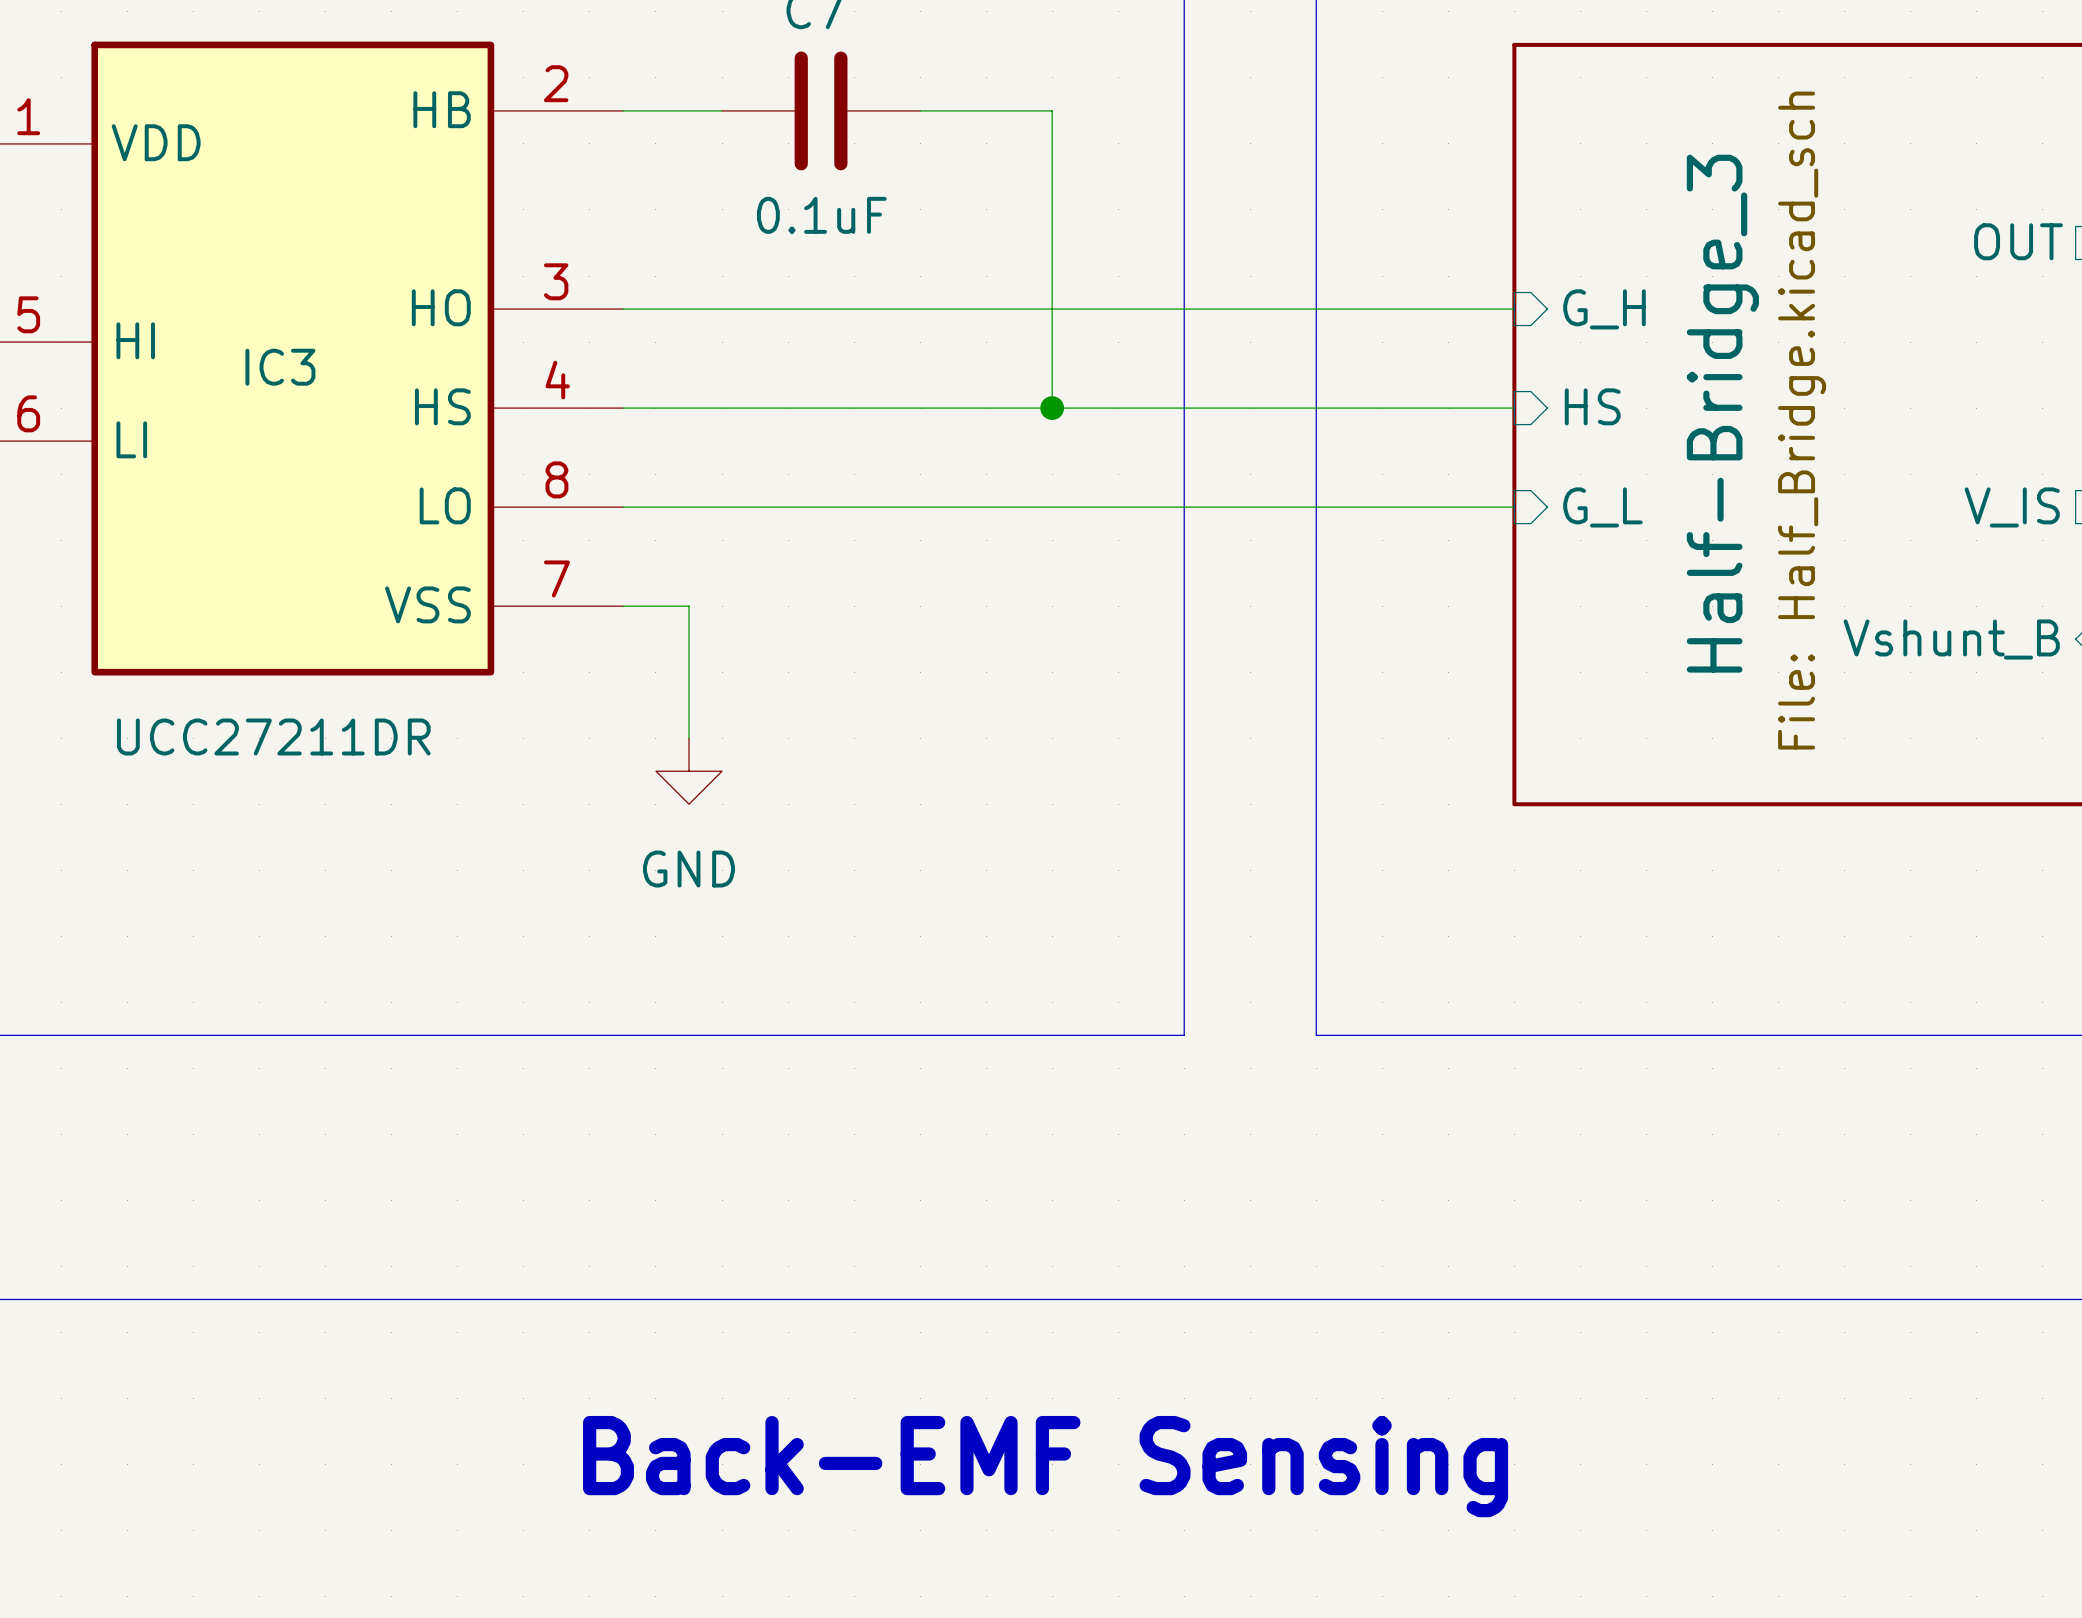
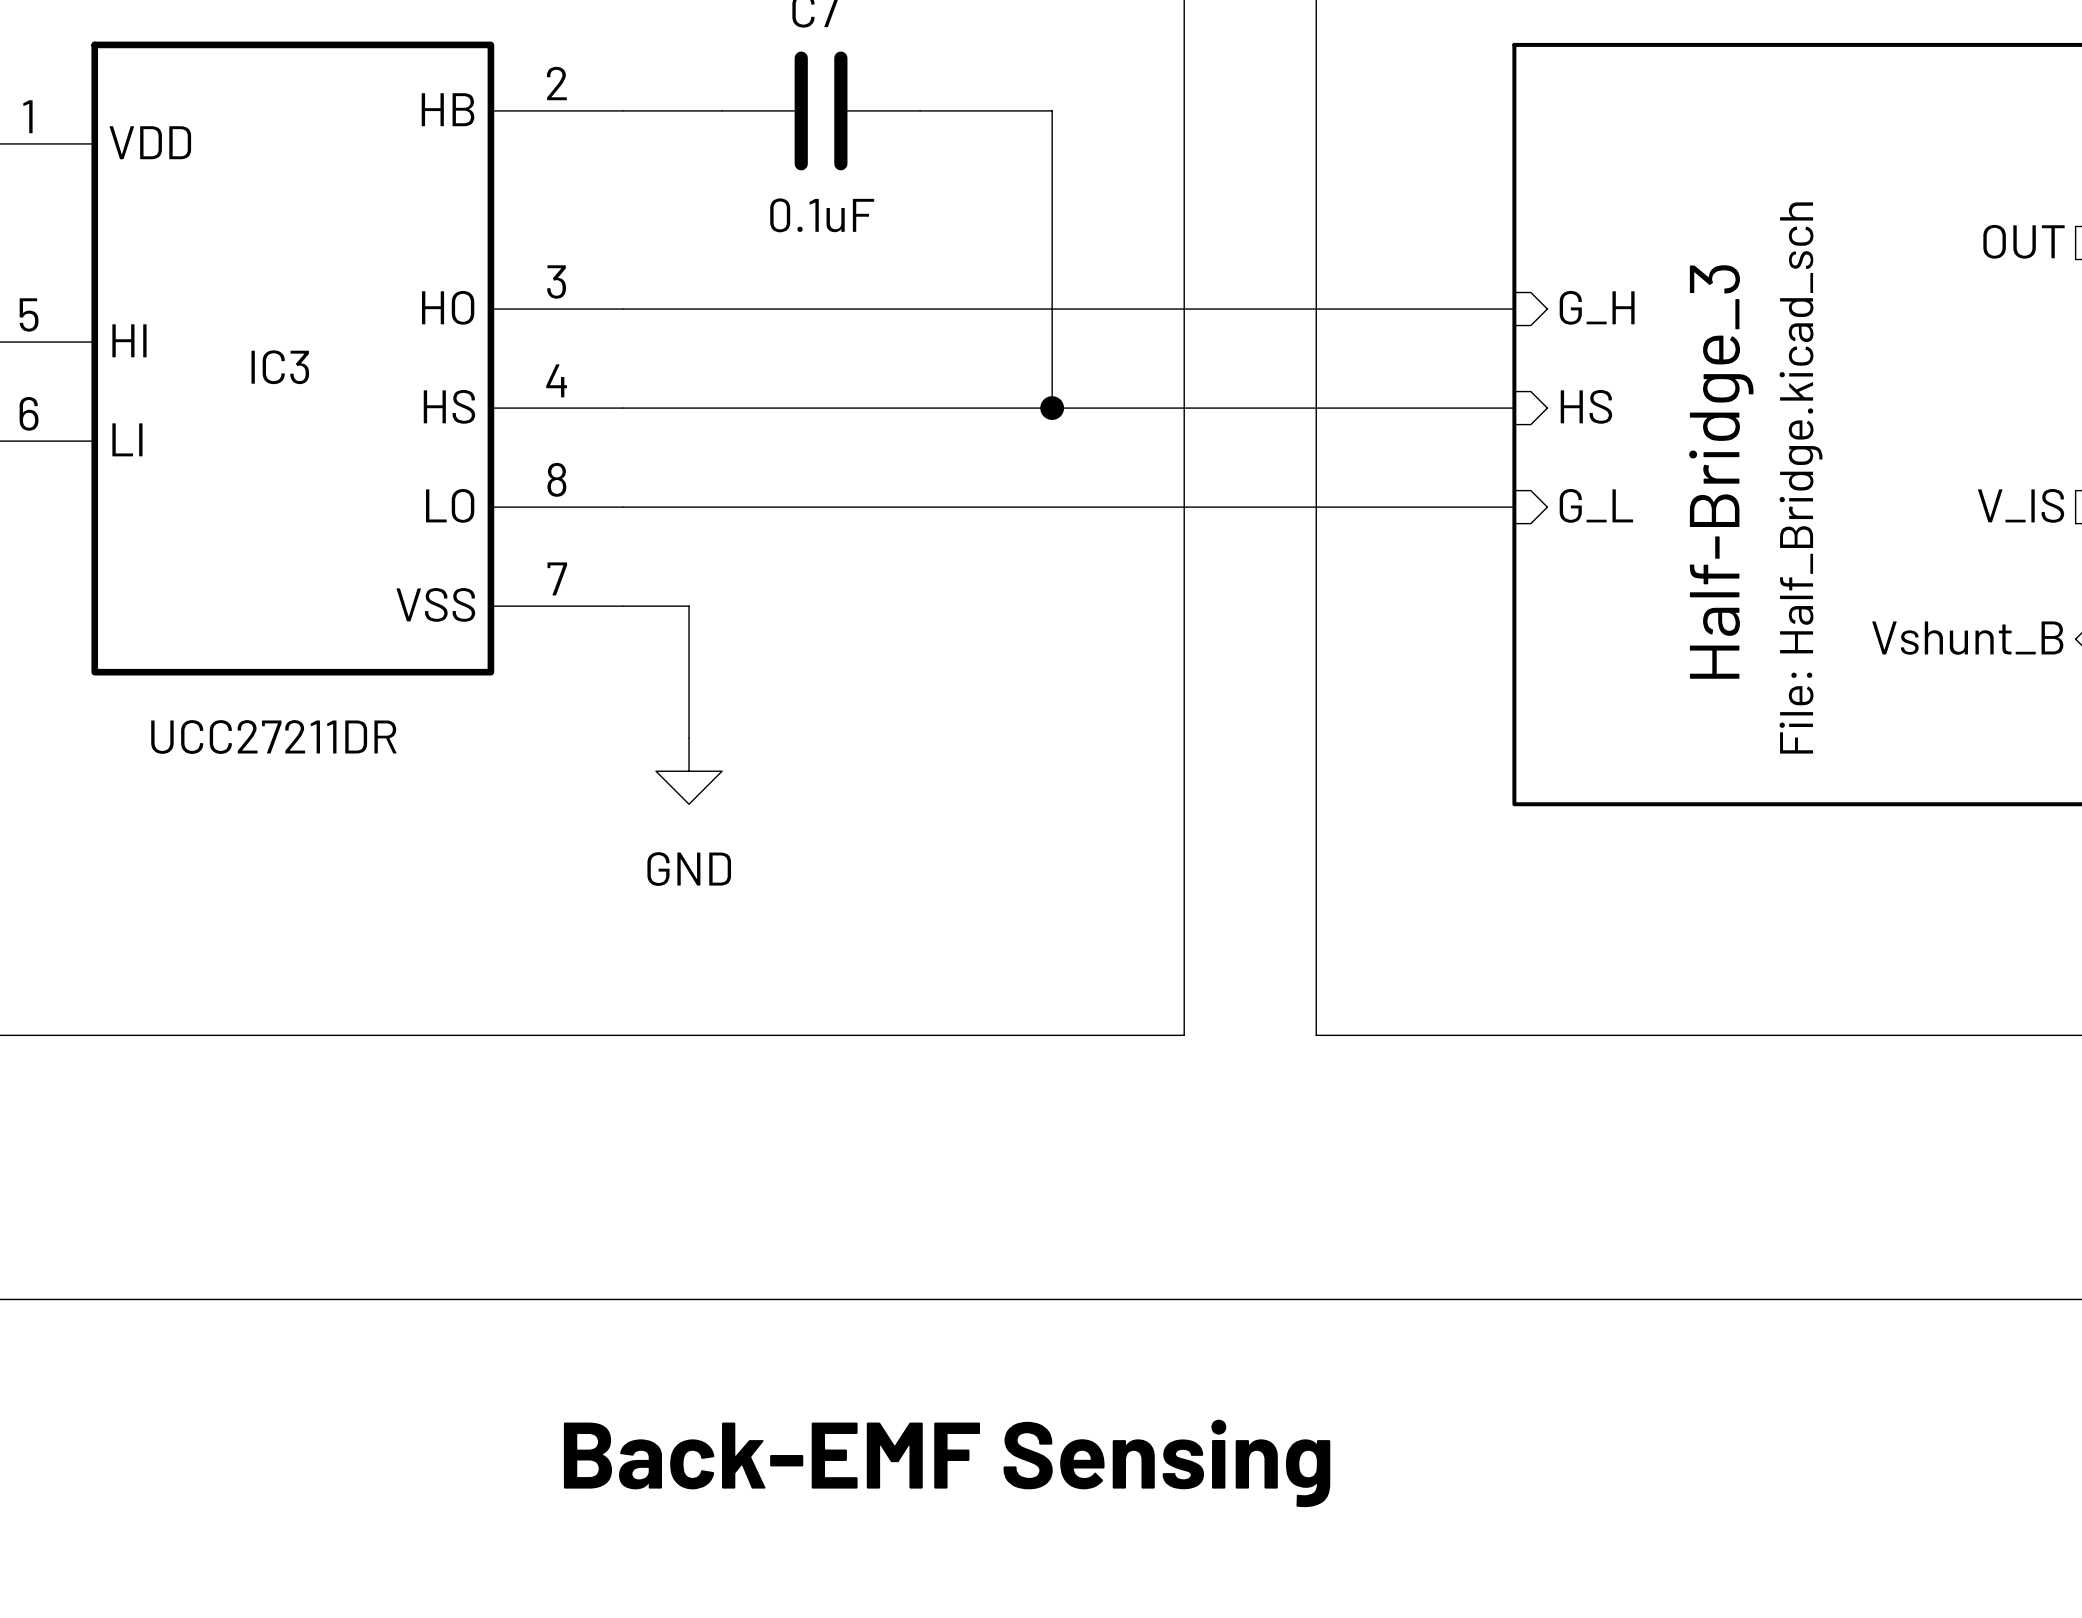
text position: Back-EMF Sensing (1045, 1466) -> Back-EMF Sensing (947, 1463)

